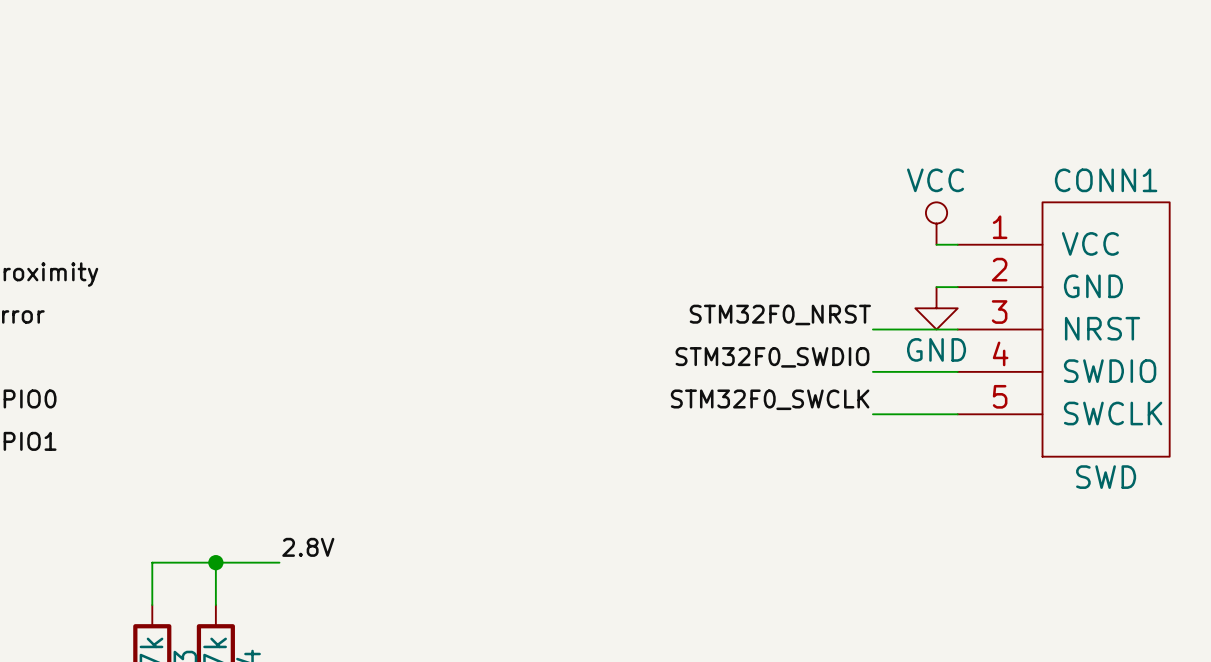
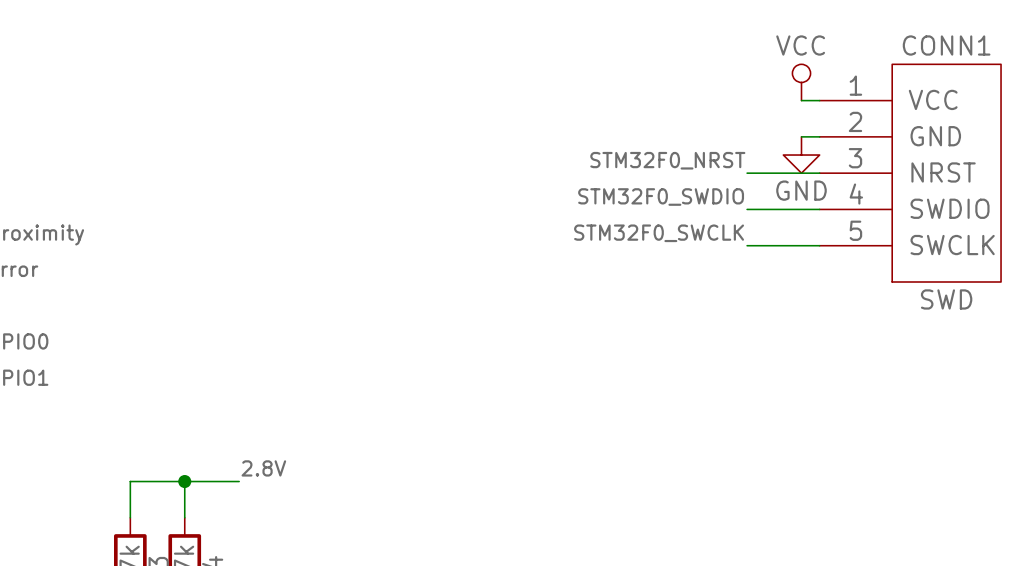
wire: none -> (801, 100) (819, 100)
wire: none -> (801, 136) (819, 136)
power symbol position: VCC (936, 223) -> VCC (801, 82)
wire: none -> (747, 209) (801, 209)
wire: none -> (747, 245) (801, 245)
power symbol position: GND (936, 308) -> GND (801, 155)
label position: STM32F0_NRST (780, 314) -> STM32F0_NRST (667, 160)
wire: (872, 329) (957, 329) -> (747, 173) (819, 173)
CONN1 position: (1063, 329) -> (910, 173)
label position: STM32F0_SWDIO (772, 357) -> STM32F0_SWDIO (661, 197)
wire: (872, 371) (957, 371) -> none
label position: STM32F0_SWCLK (770, 399) -> STM32F0_SWCLK (659, 233)
wire: (872, 414) (957, 414) -> none

